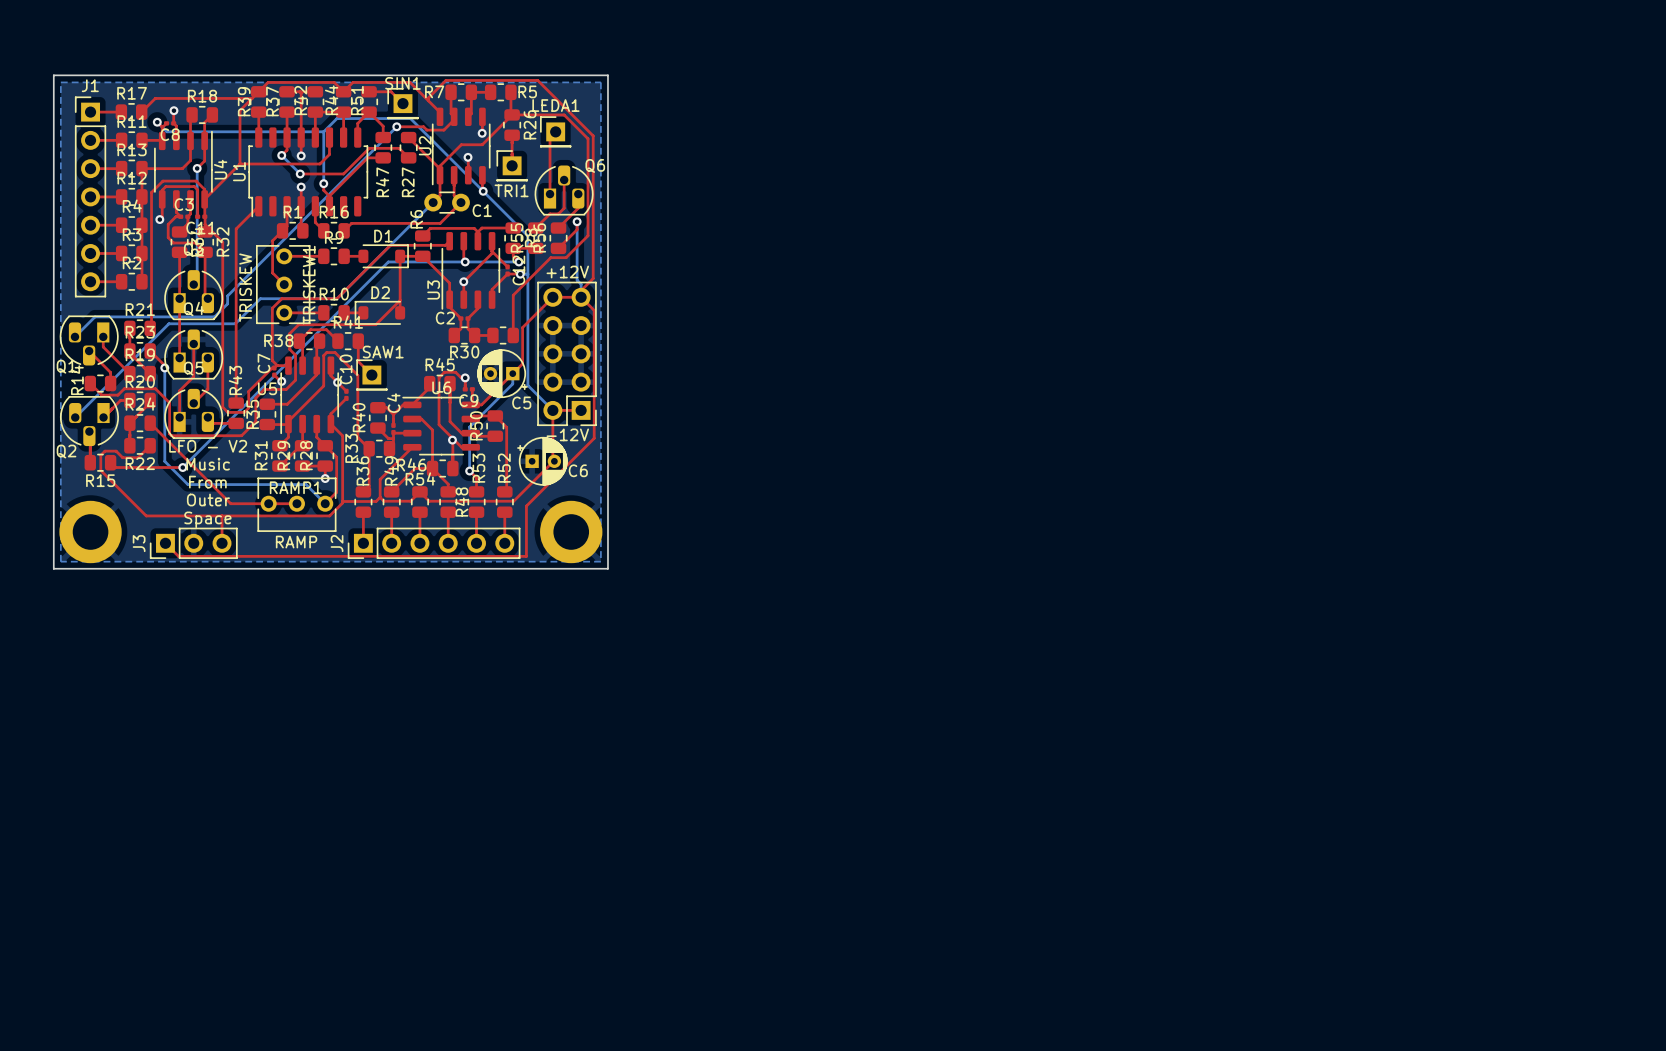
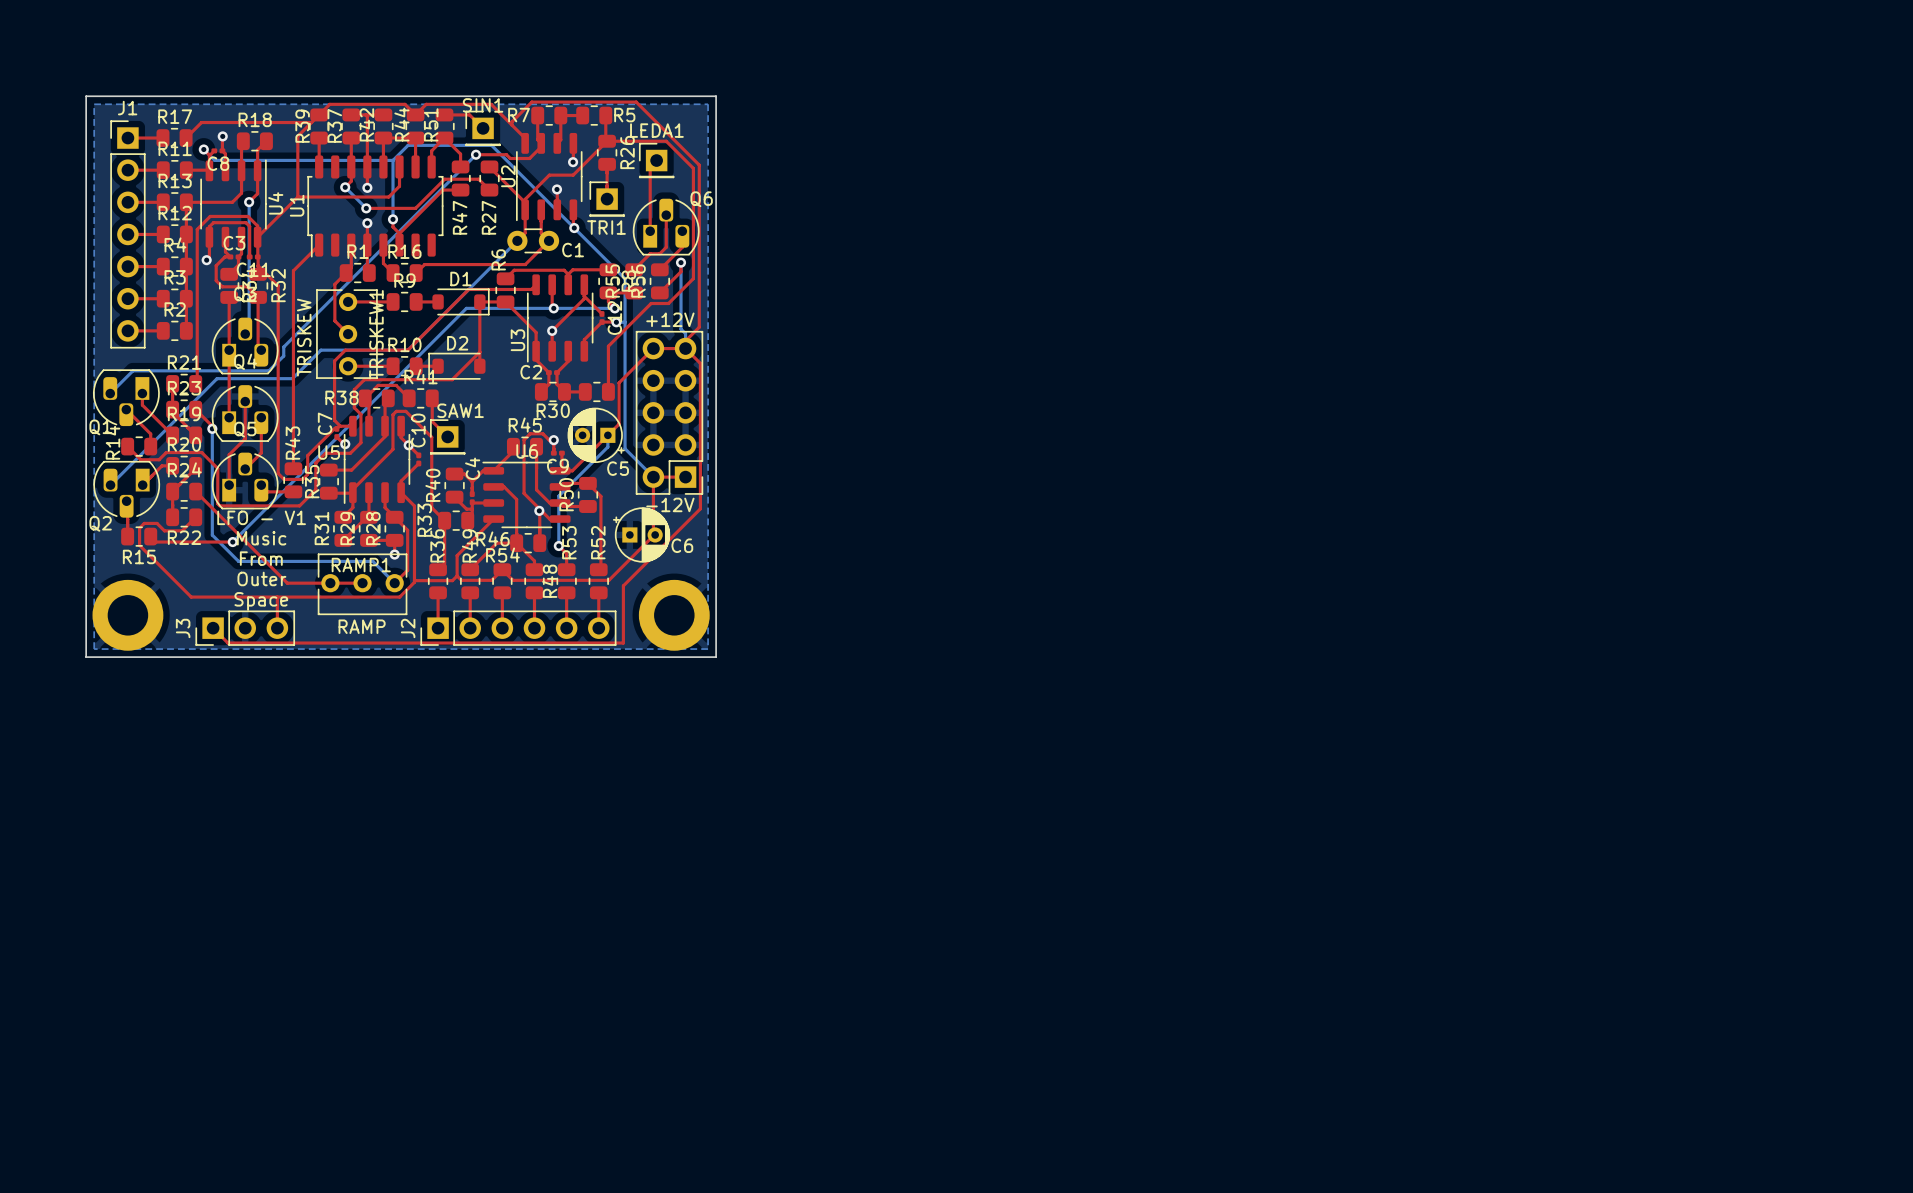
text: LFO - V2 (208, 446) -> LFO - V1 (261, 517)

